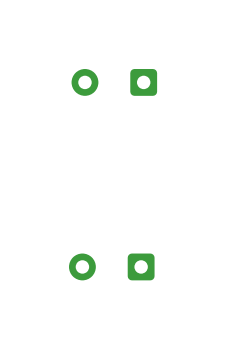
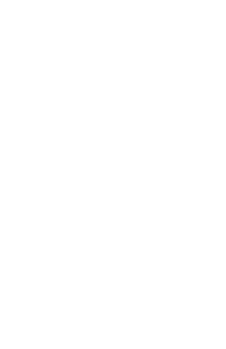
part: (114, 82) -> none
part: (111, 266) -> none

